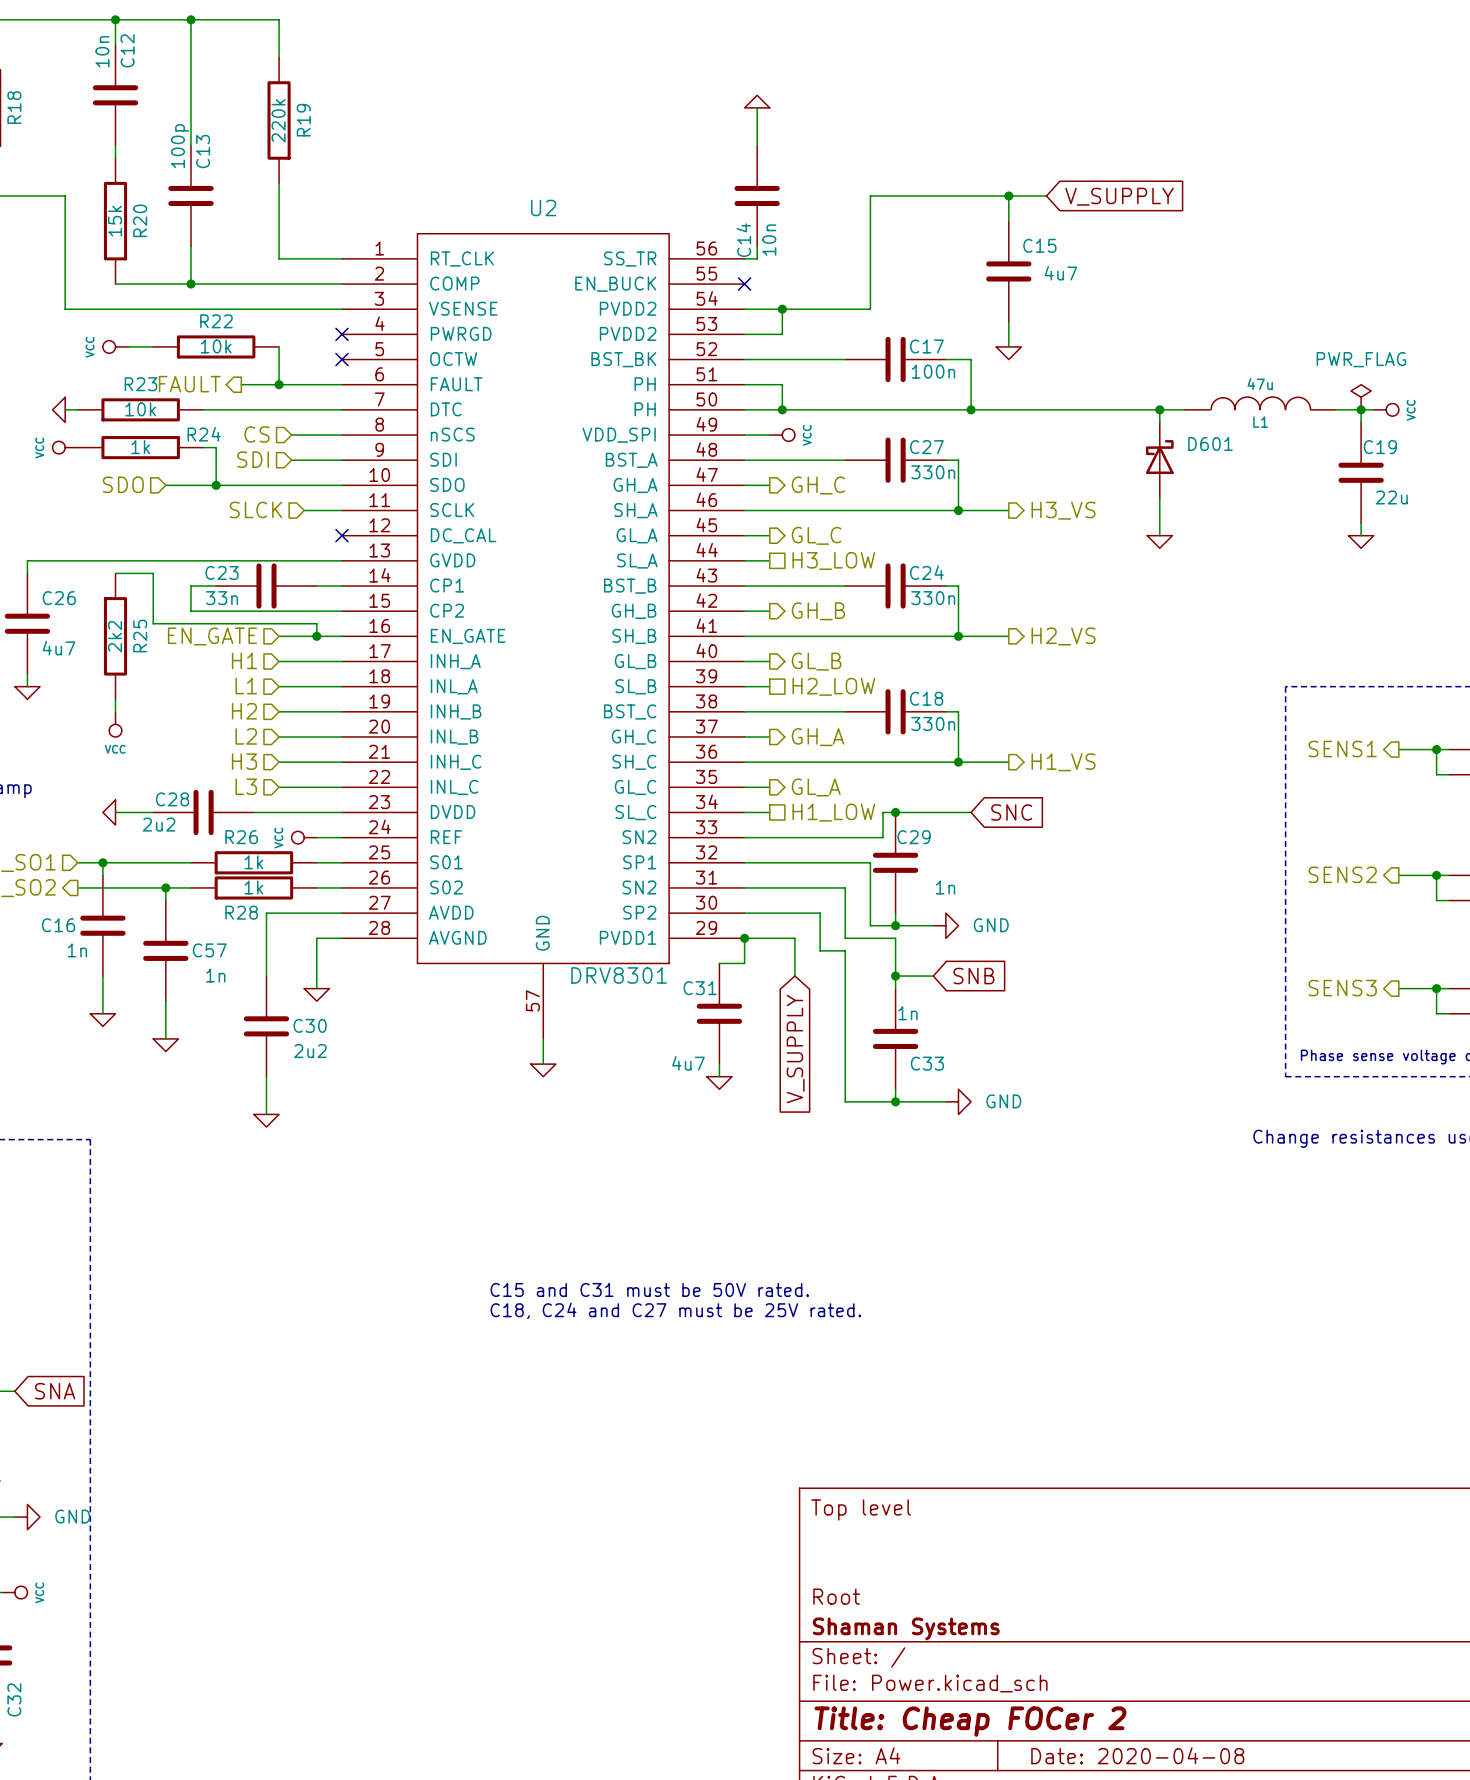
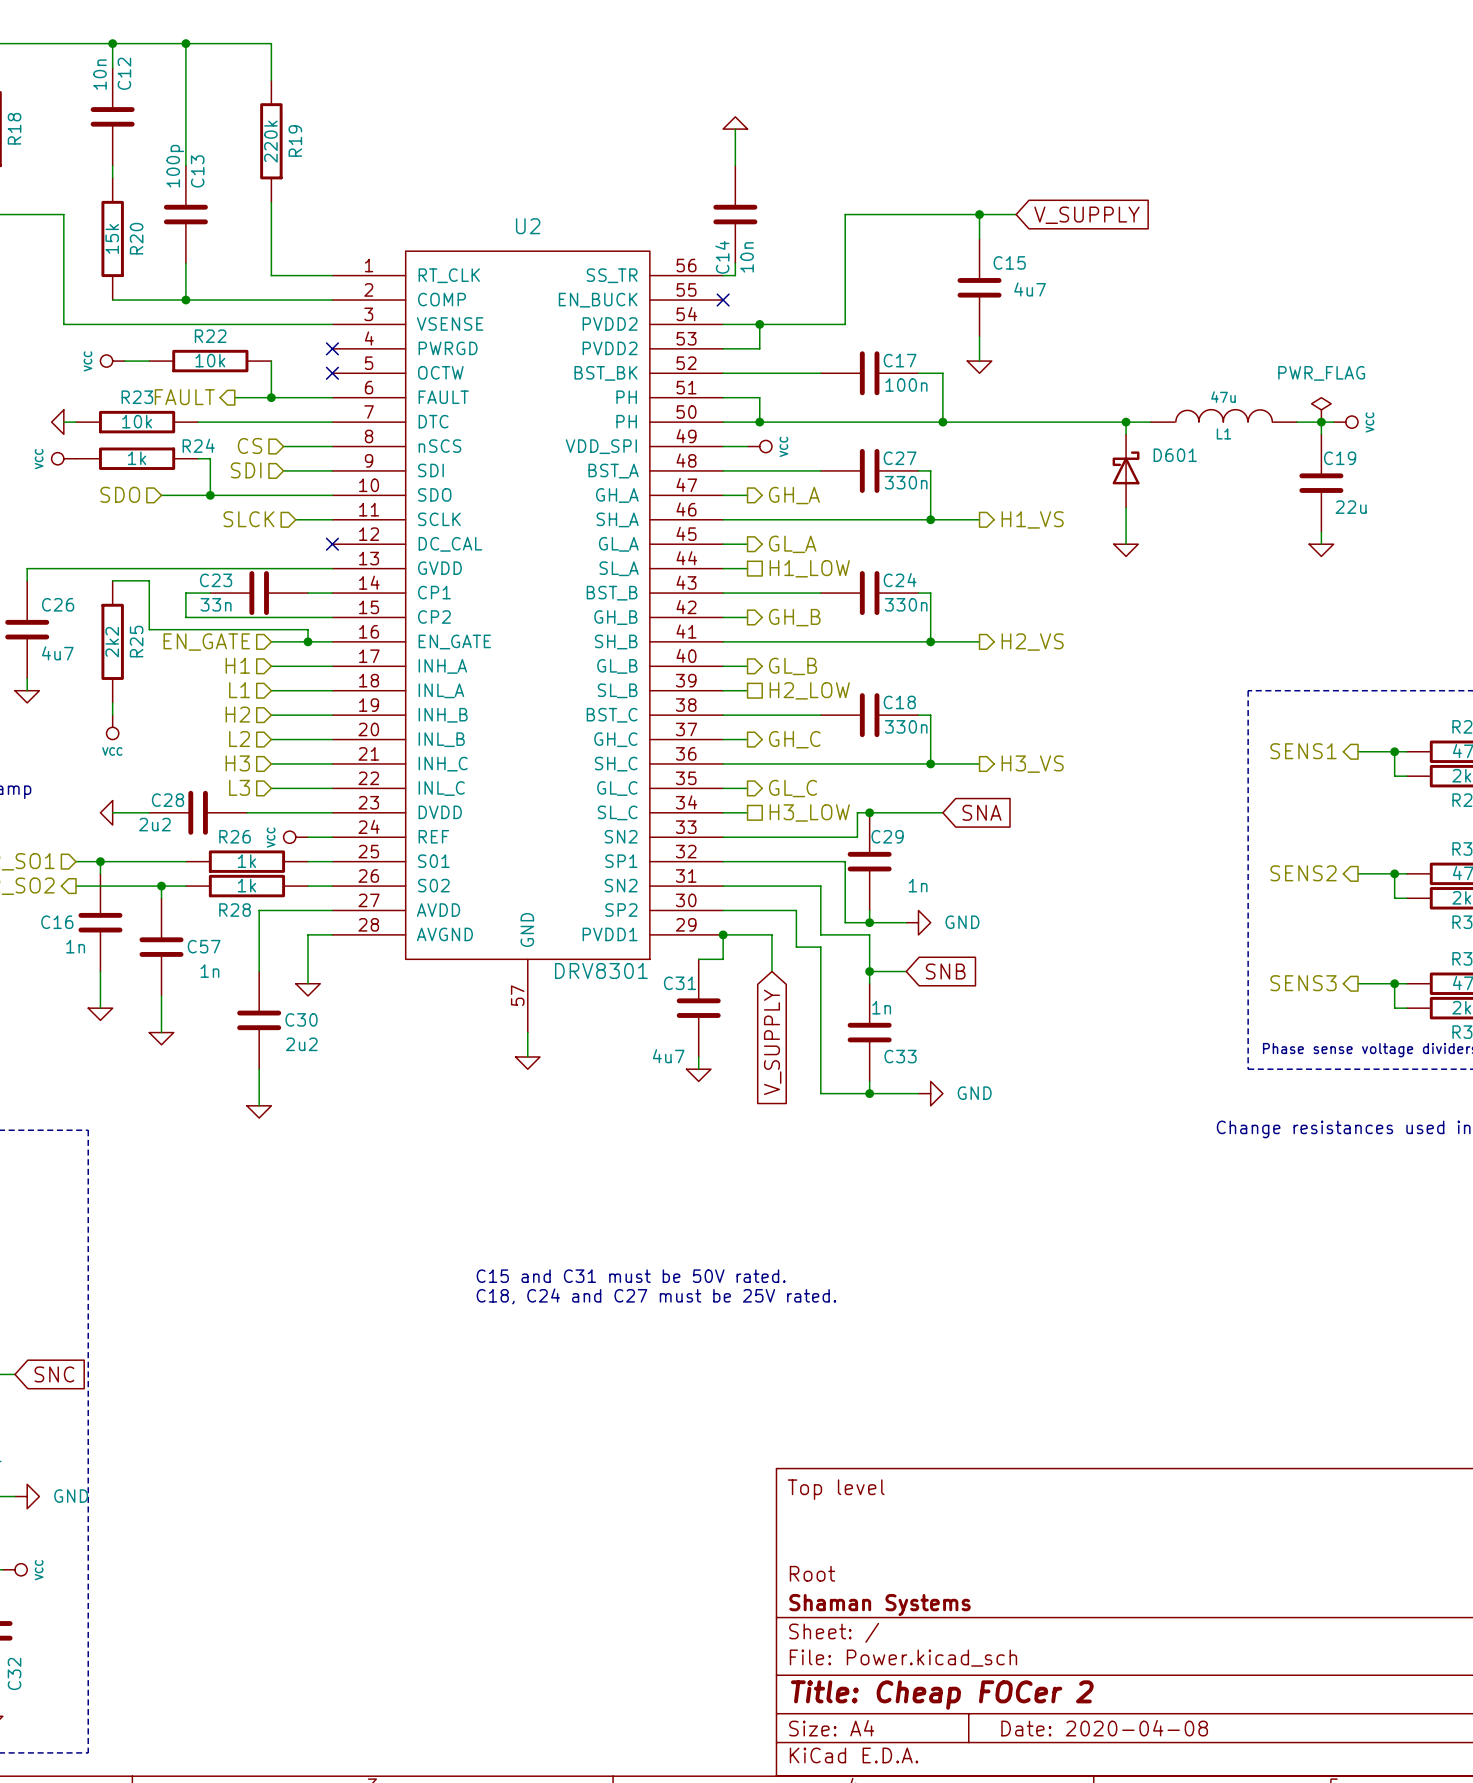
hierarchical label: GH_C (818, 485) -> GH_A (794, 495)
hierarchical label: H3_VS (1063, 510) -> H1_VS (1032, 519)
hierarchical label: GL_C (816, 535) -> GL_A (792, 544)
hierarchical label: H3_LOW (833, 560) -> H1_LOW (809, 568)
hierarchical label: GH_A (818, 737) -> GH_C (794, 739)
hierarchical label: H1_VS (1063, 762) -> H3_VS (1032, 764)
hierarchical label: GL_A (816, 787) -> GL_C (792, 788)
hierarchical label: H1_LOW (833, 812) -> H3_LOW (809, 812)
global label: SNC (1011, 812) -> SNA (981, 812)
global label: SNA (55, 1391) -> SNC (54, 1374)

